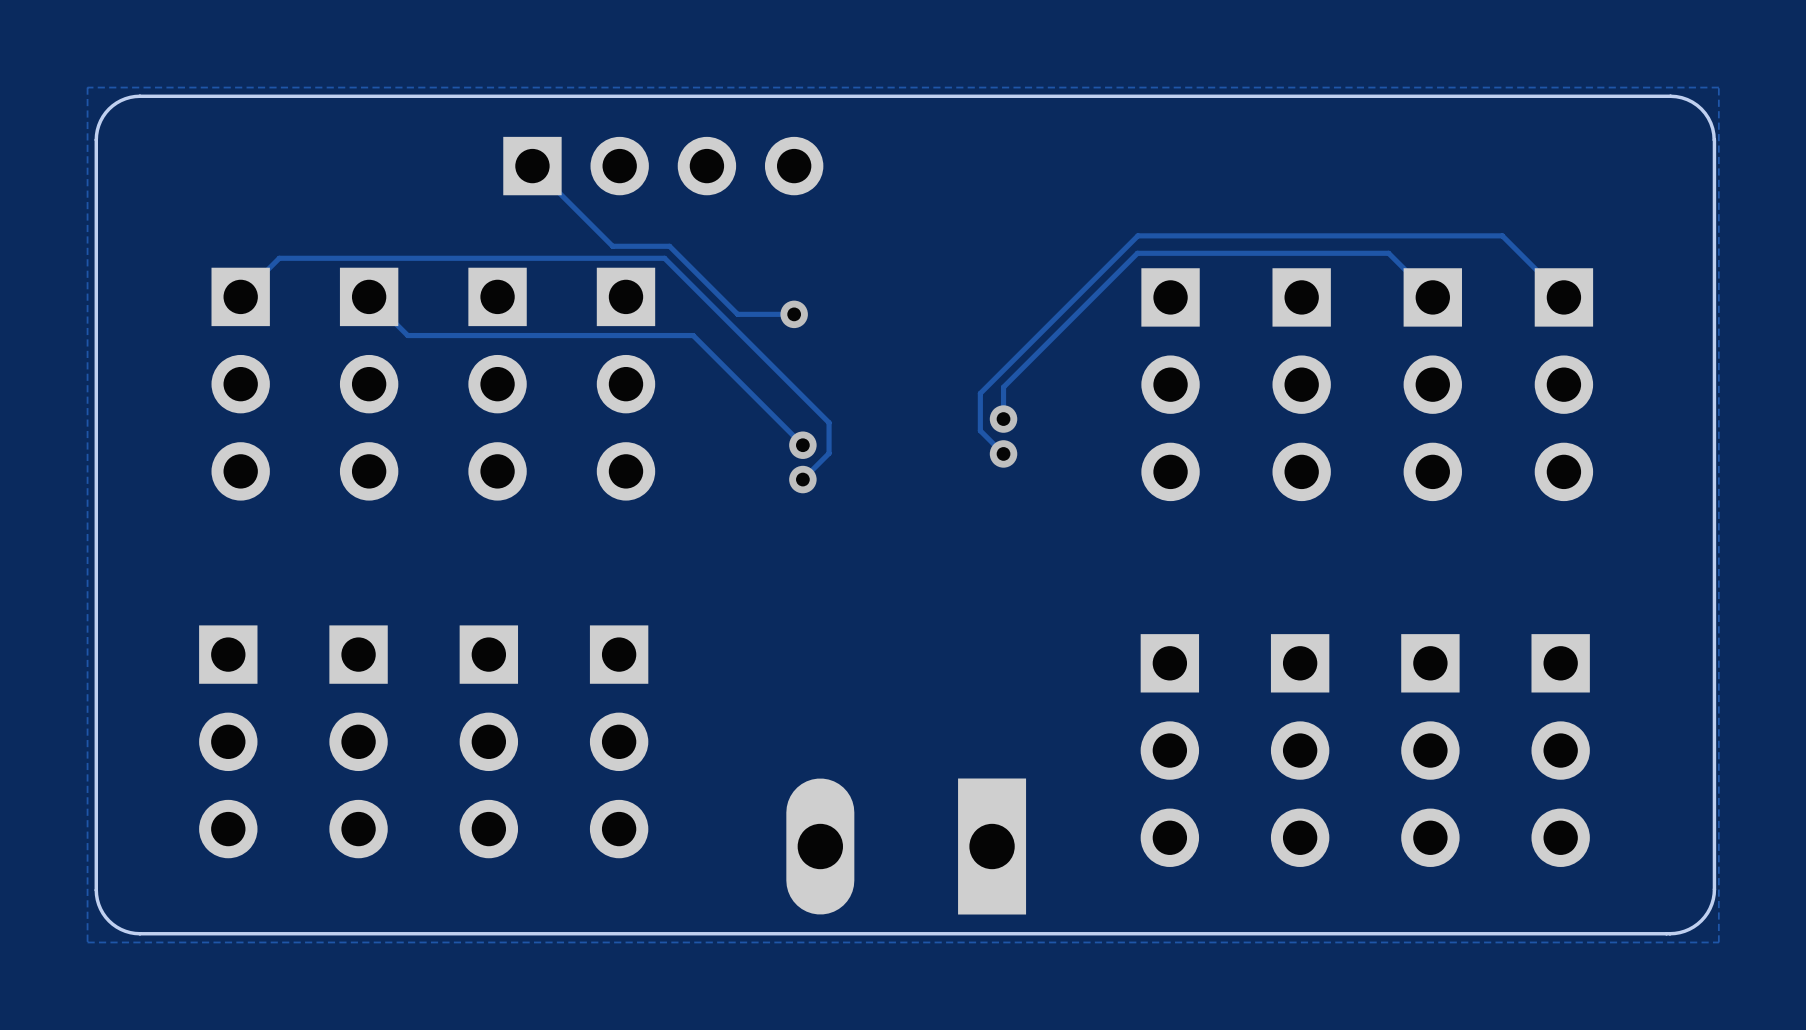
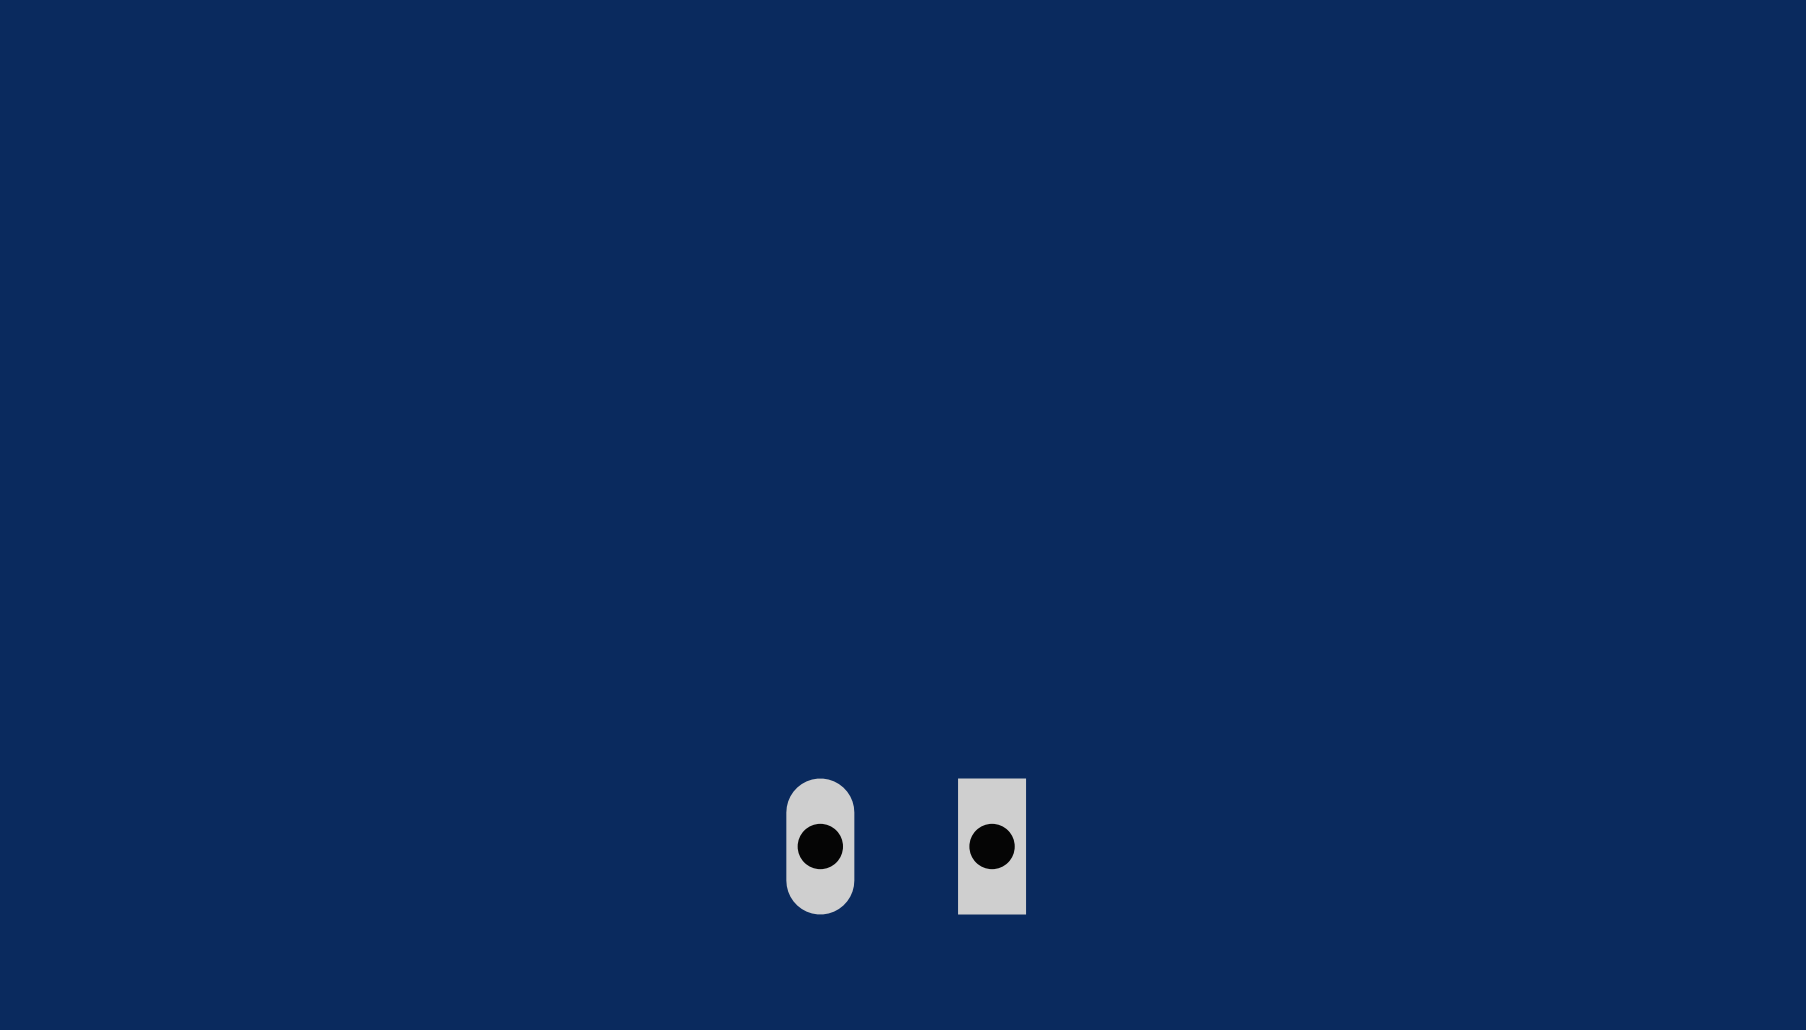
zone outline: (1718, 87) (87, 87) (87, 942) (1718, 942) (1718, 87) -> none
board edge: (1714, 139) (1714, 889) (1713, 899) (1707, 912) (1701, 920) (1689, 929) (1669, 933) (139, 933) (130, 932) (116, 927) (105, 917) (100, 909) (96, 890) (96, 139) (97, 130) (102, 116) (112, 105) (120, 100) (139, 96) (1670, 96) (1687, 99) (1701, 109) (1710, 123) (1714, 139) -> none
track: (532, 166) (612, 246) (669, 246) (737, 314) (794, 314) -> none
part: (663, 166) -> none
track: (240, 296) (279, 258) (664, 258) (829, 422) (829, 453) (802, 479) -> none
track: (369, 296) (407, 335) (693, 335) (802, 445) -> none
track: (1432, 297) (1388, 253) (1137, 253) (1003, 387) (1003, 419) -> none
track: (1563, 297) (1502, 235) (1137, 235) (980, 393) (980, 430) (1003, 453) -> none
via: (794, 314) -> none
part: (240, 384) -> none
part: (369, 384) -> none
part: (497, 384) -> none
part: (625, 384) -> none
part: (1170, 384) -> none
part: (1301, 384) -> none
part: (1432, 384) -> none
part: (1563, 384) -> none
via: (1003, 419) -> none
via: (802, 445) -> none
via: (1003, 453) -> none
via: (802, 479) -> none
part: (228, 741) -> none
part: (358, 741) -> none
part: (488, 741) -> none
part: (619, 741) -> none
part: (1169, 750) -> none
part: (1300, 750) -> none
part: (1430, 750) -> none
part: (1560, 750) -> none

